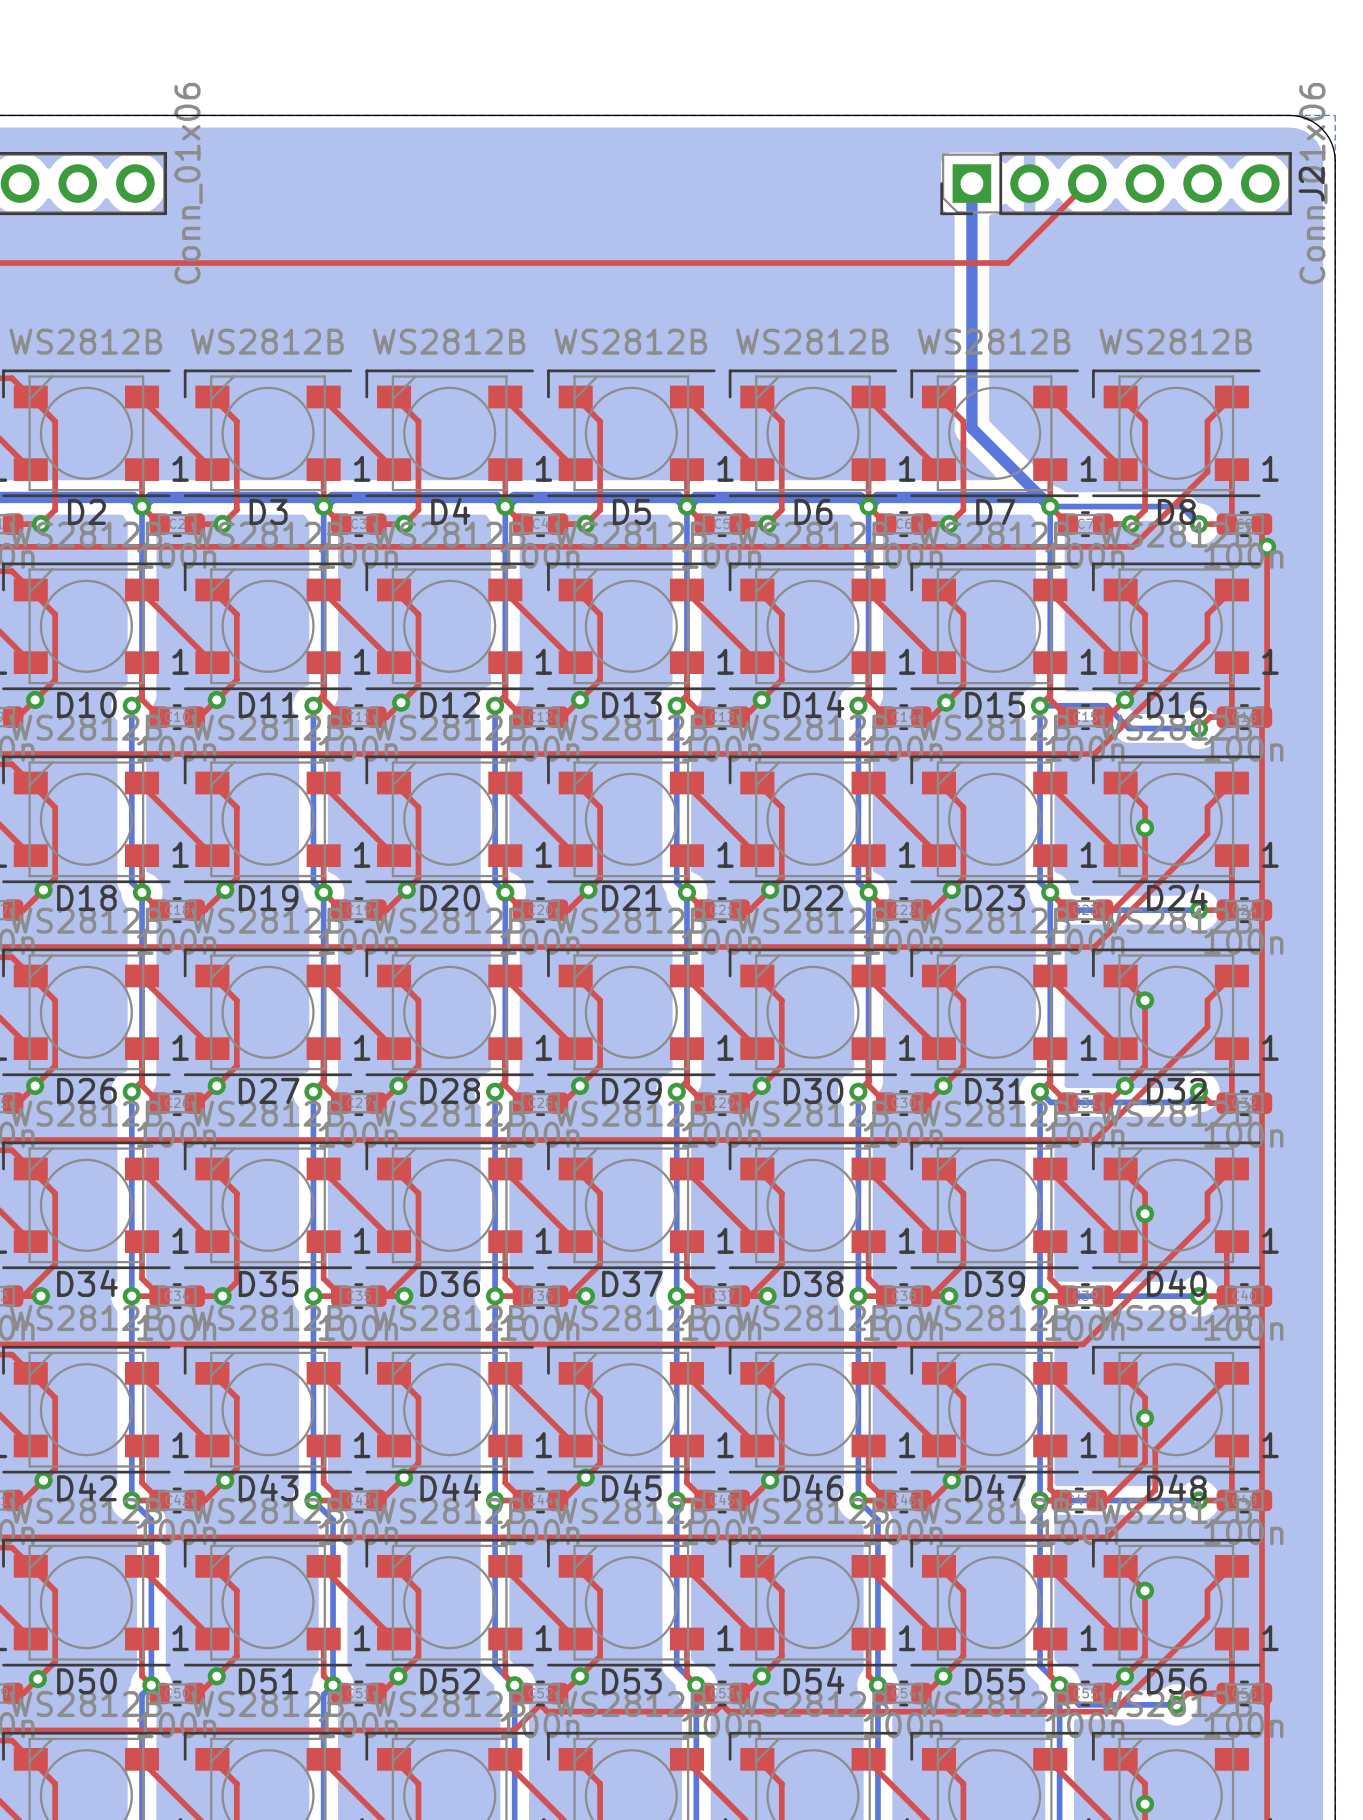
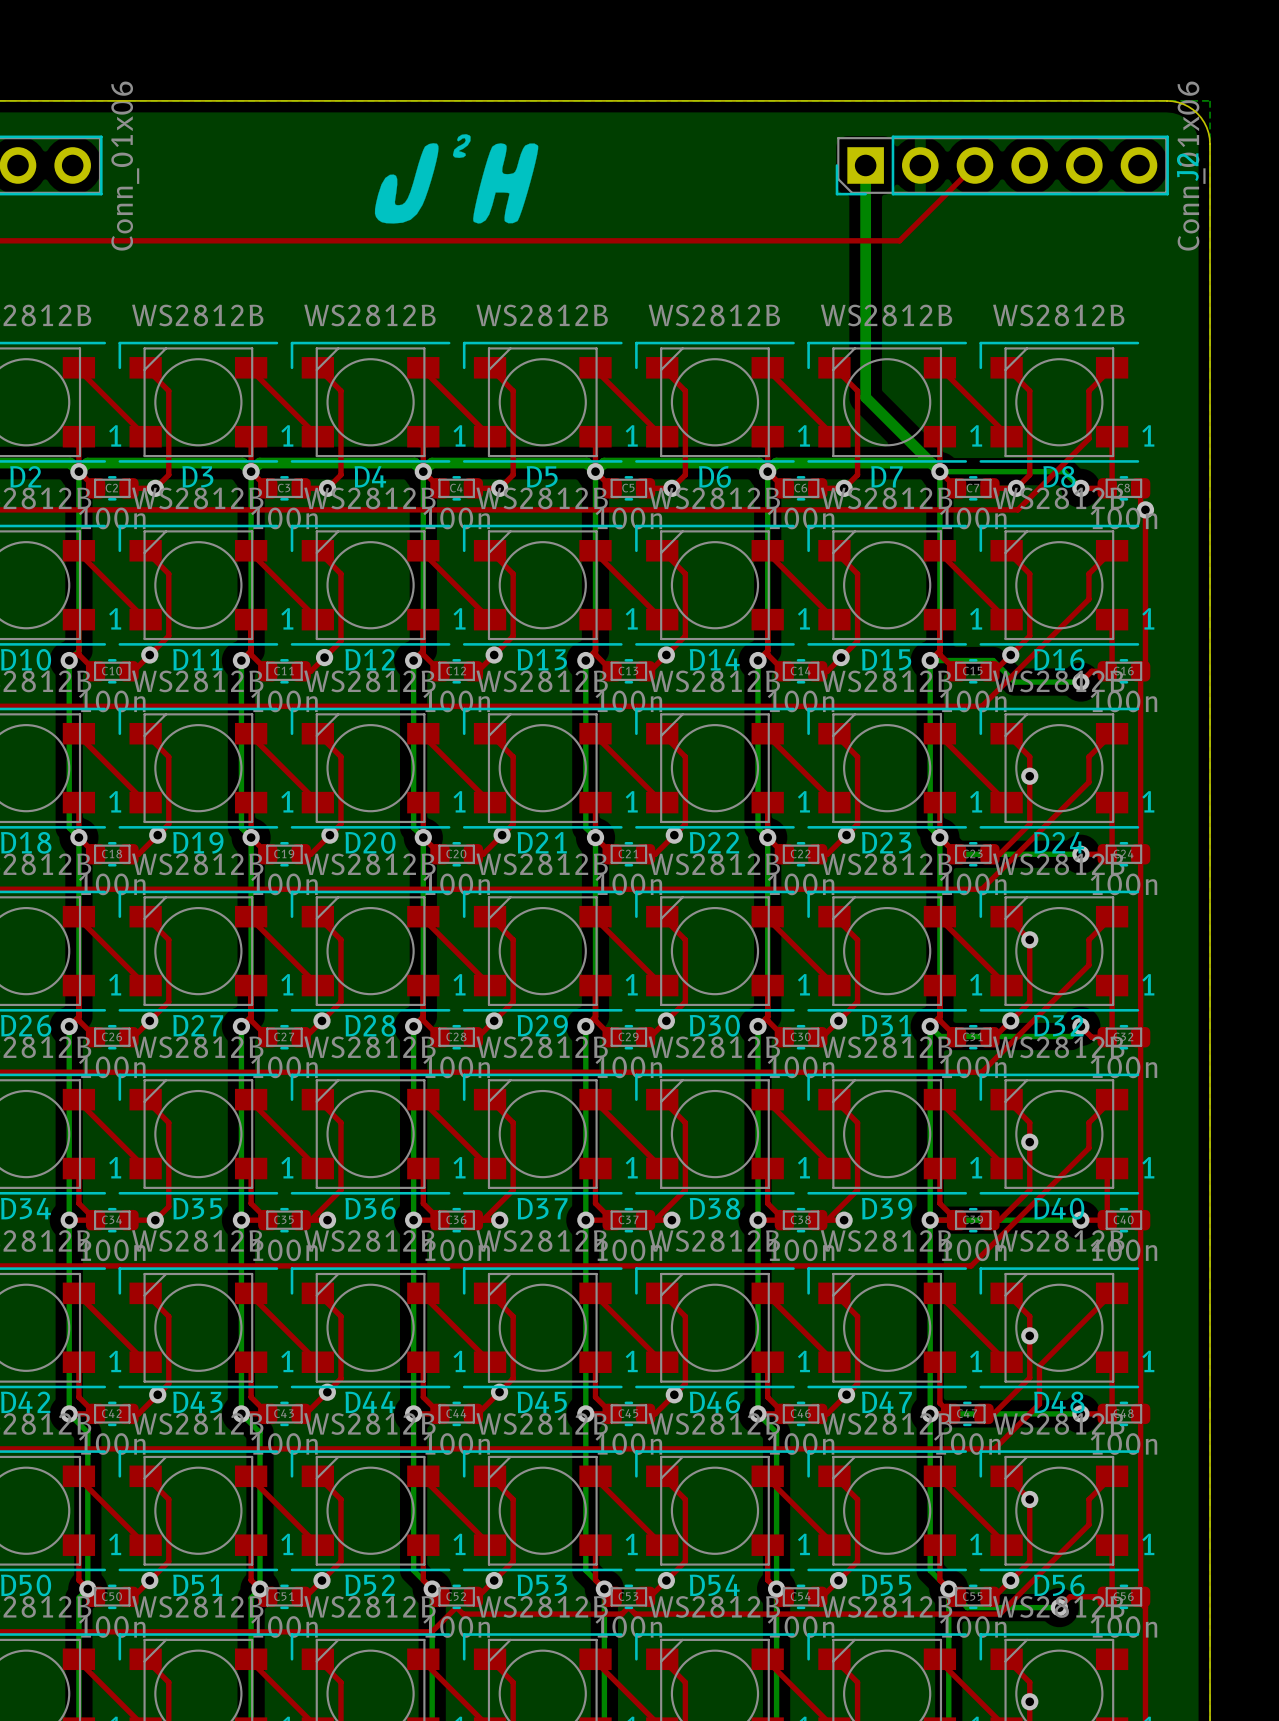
drawing: none -> [374, 134, 539, 224]

